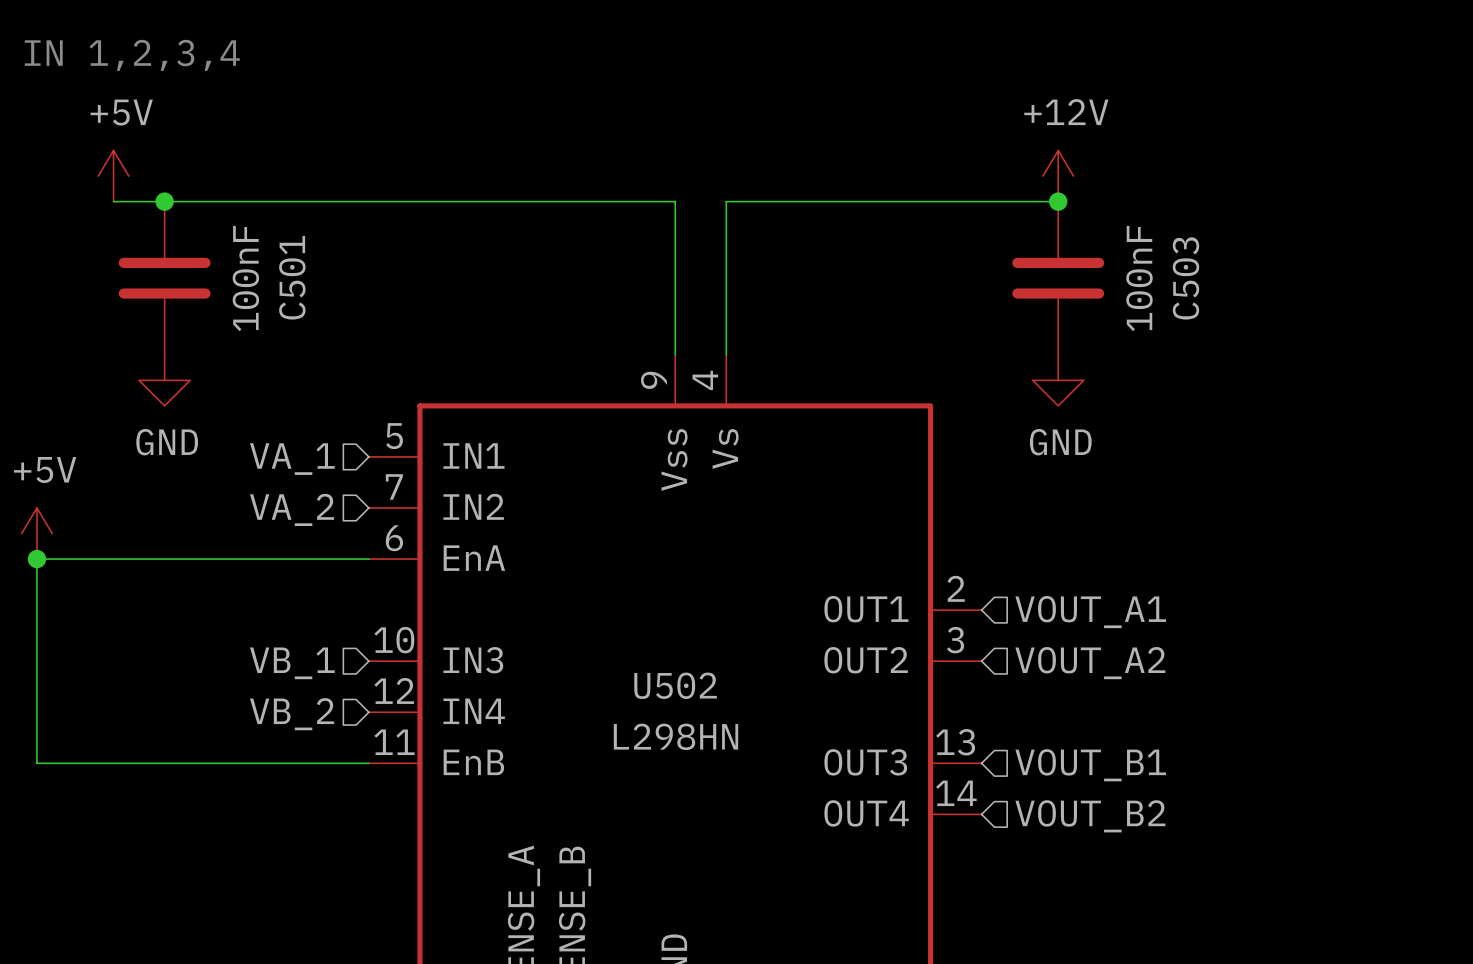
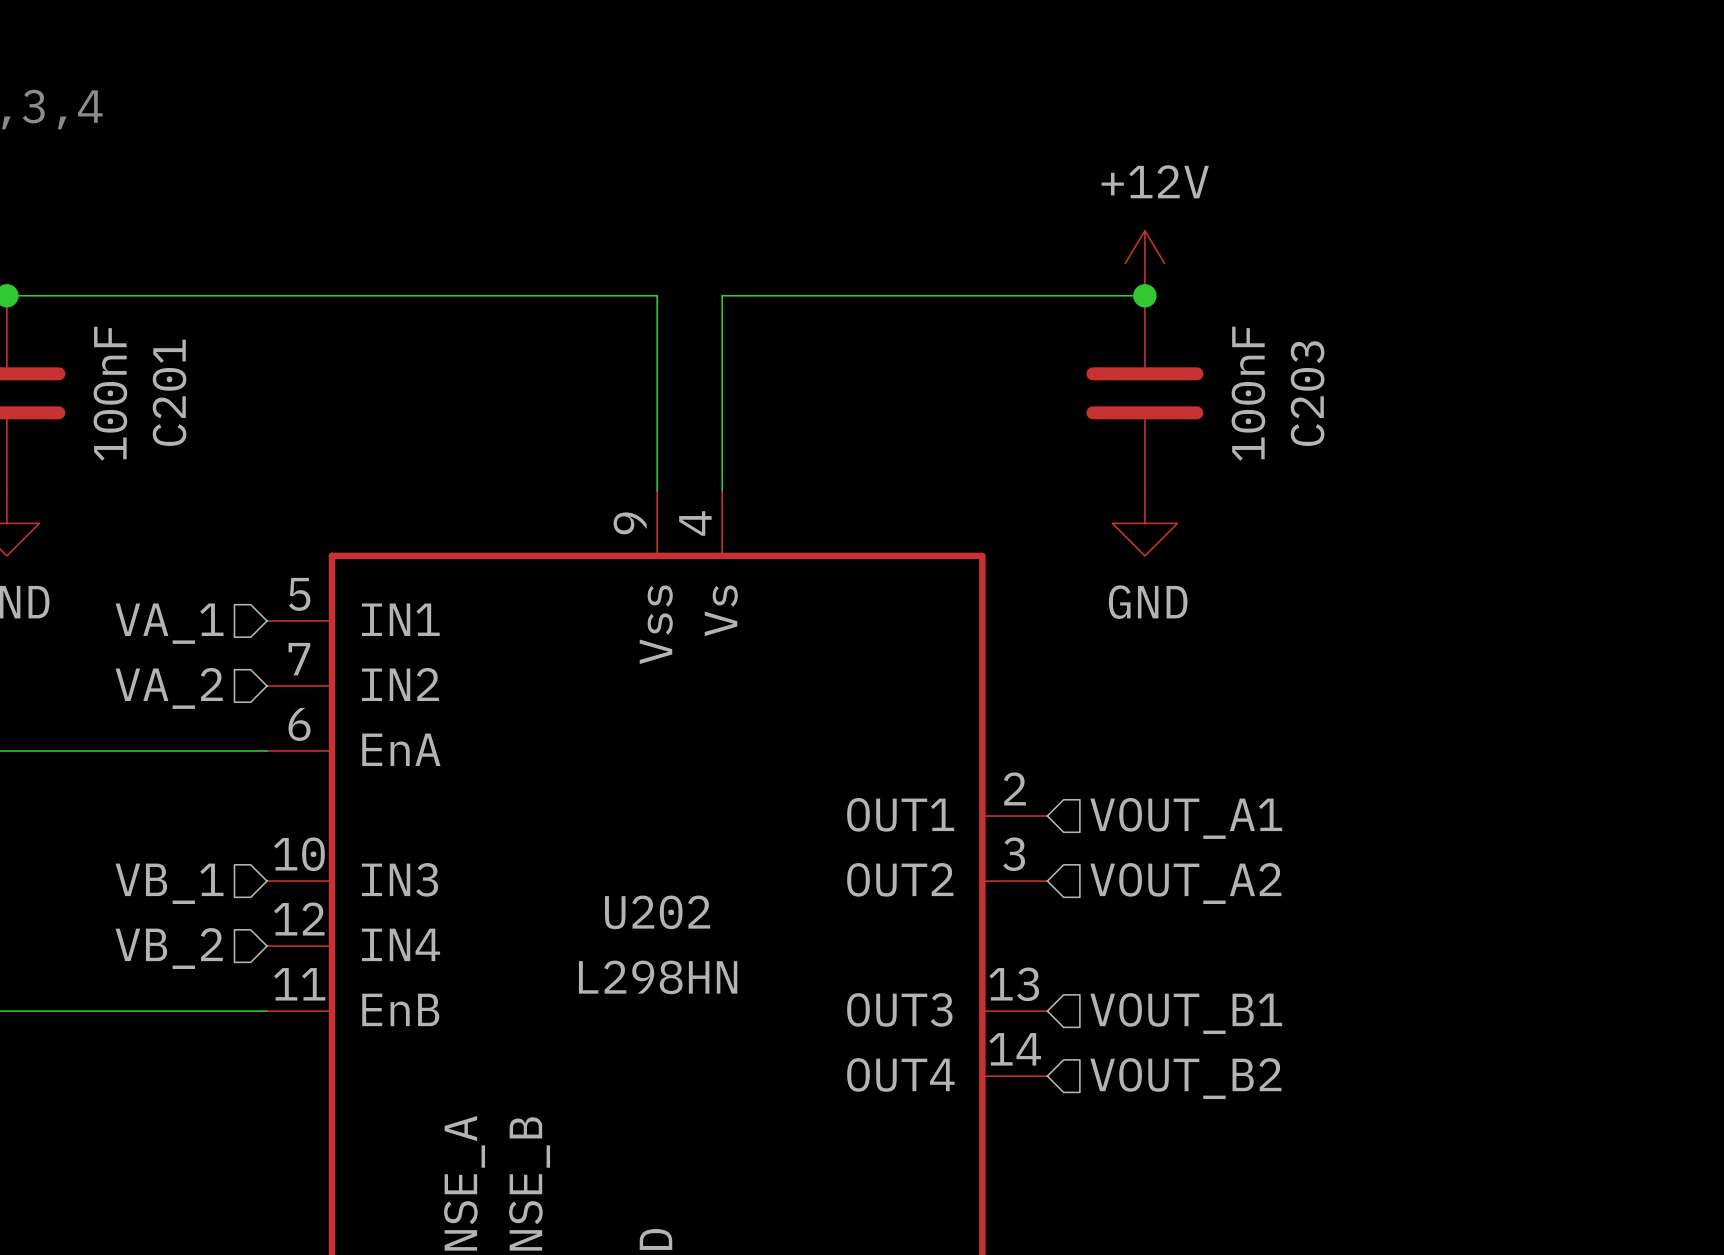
C501 name: C501 (292, 277) -> C201 (169, 392)
C503 name: C503 (1185, 278) -> C203 (1307, 393)
U502 name: U502 (675, 685) -> U202 (657, 912)

